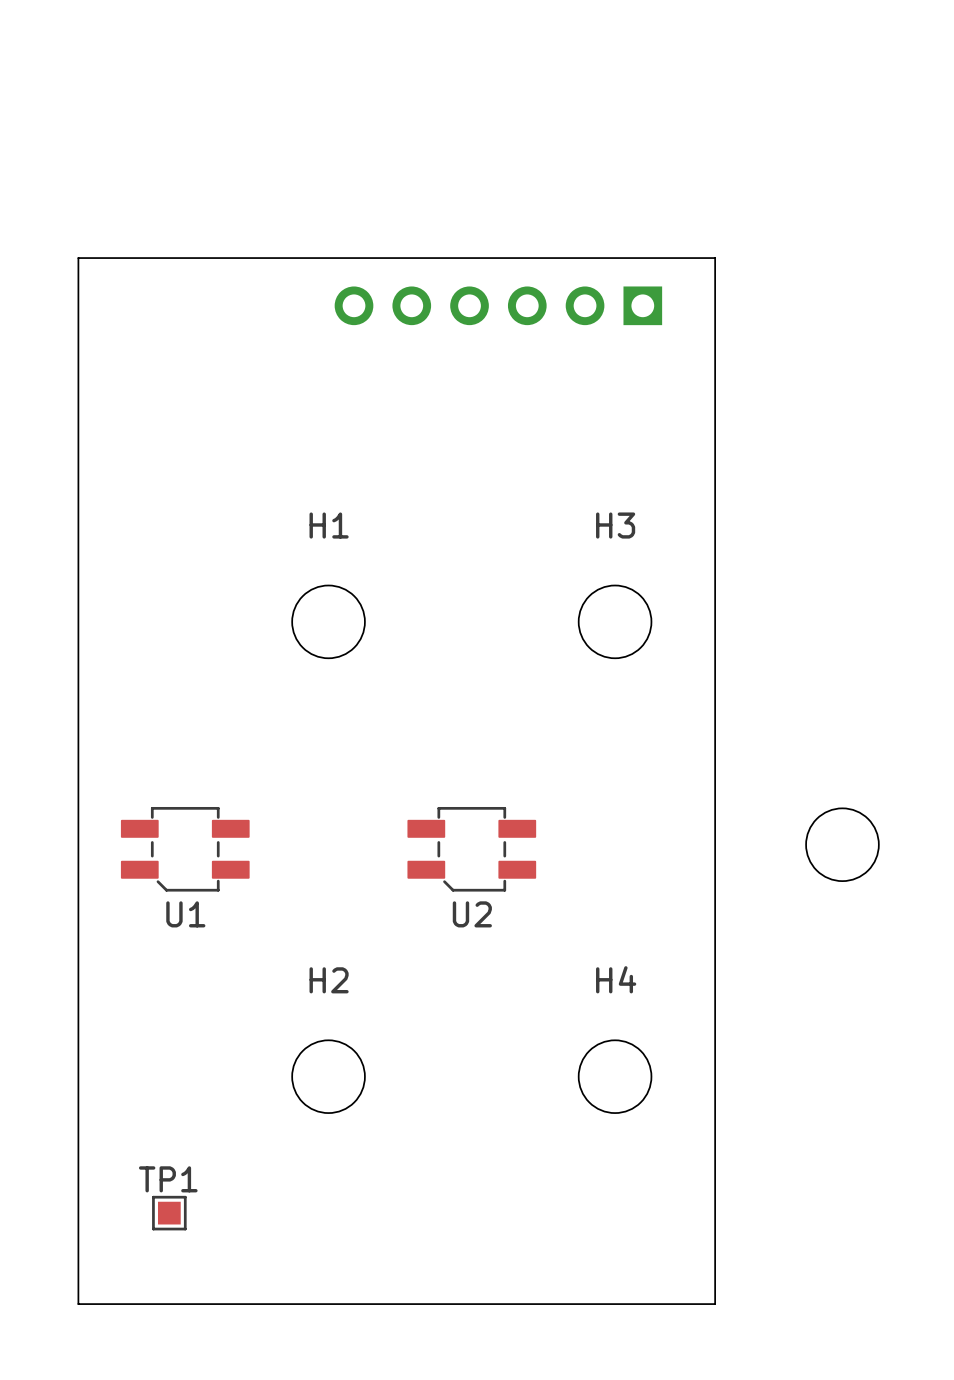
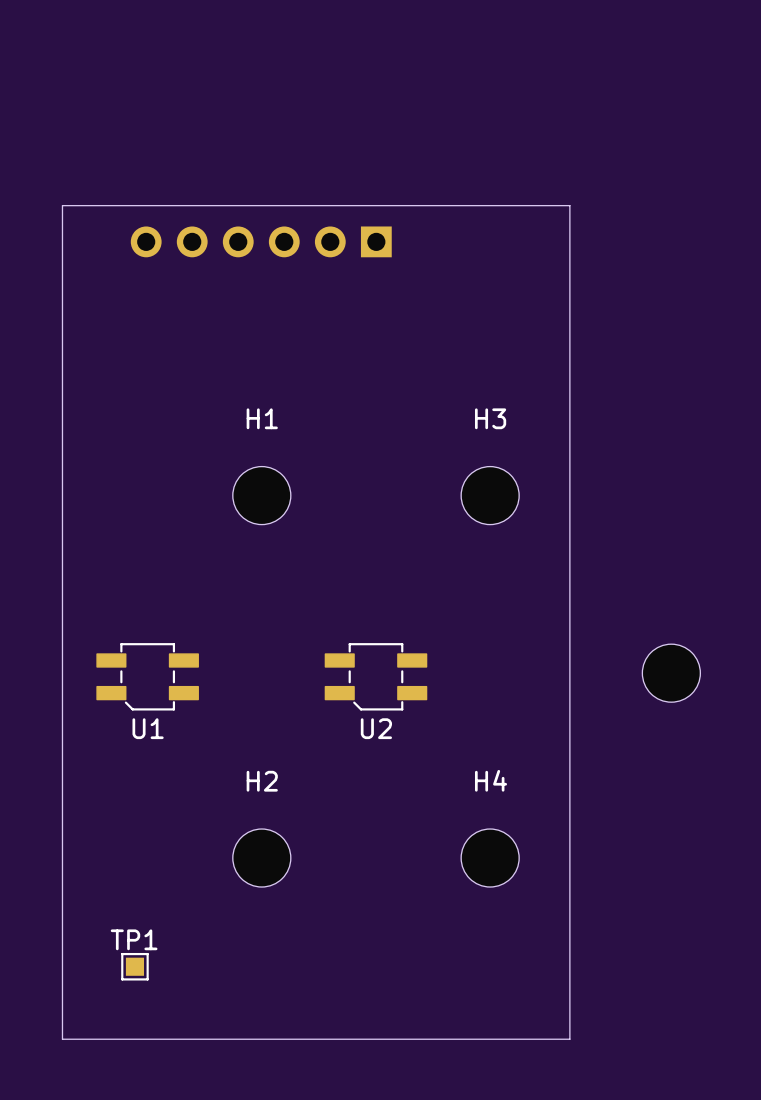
part position: (498, 305) -> (261, 241)

